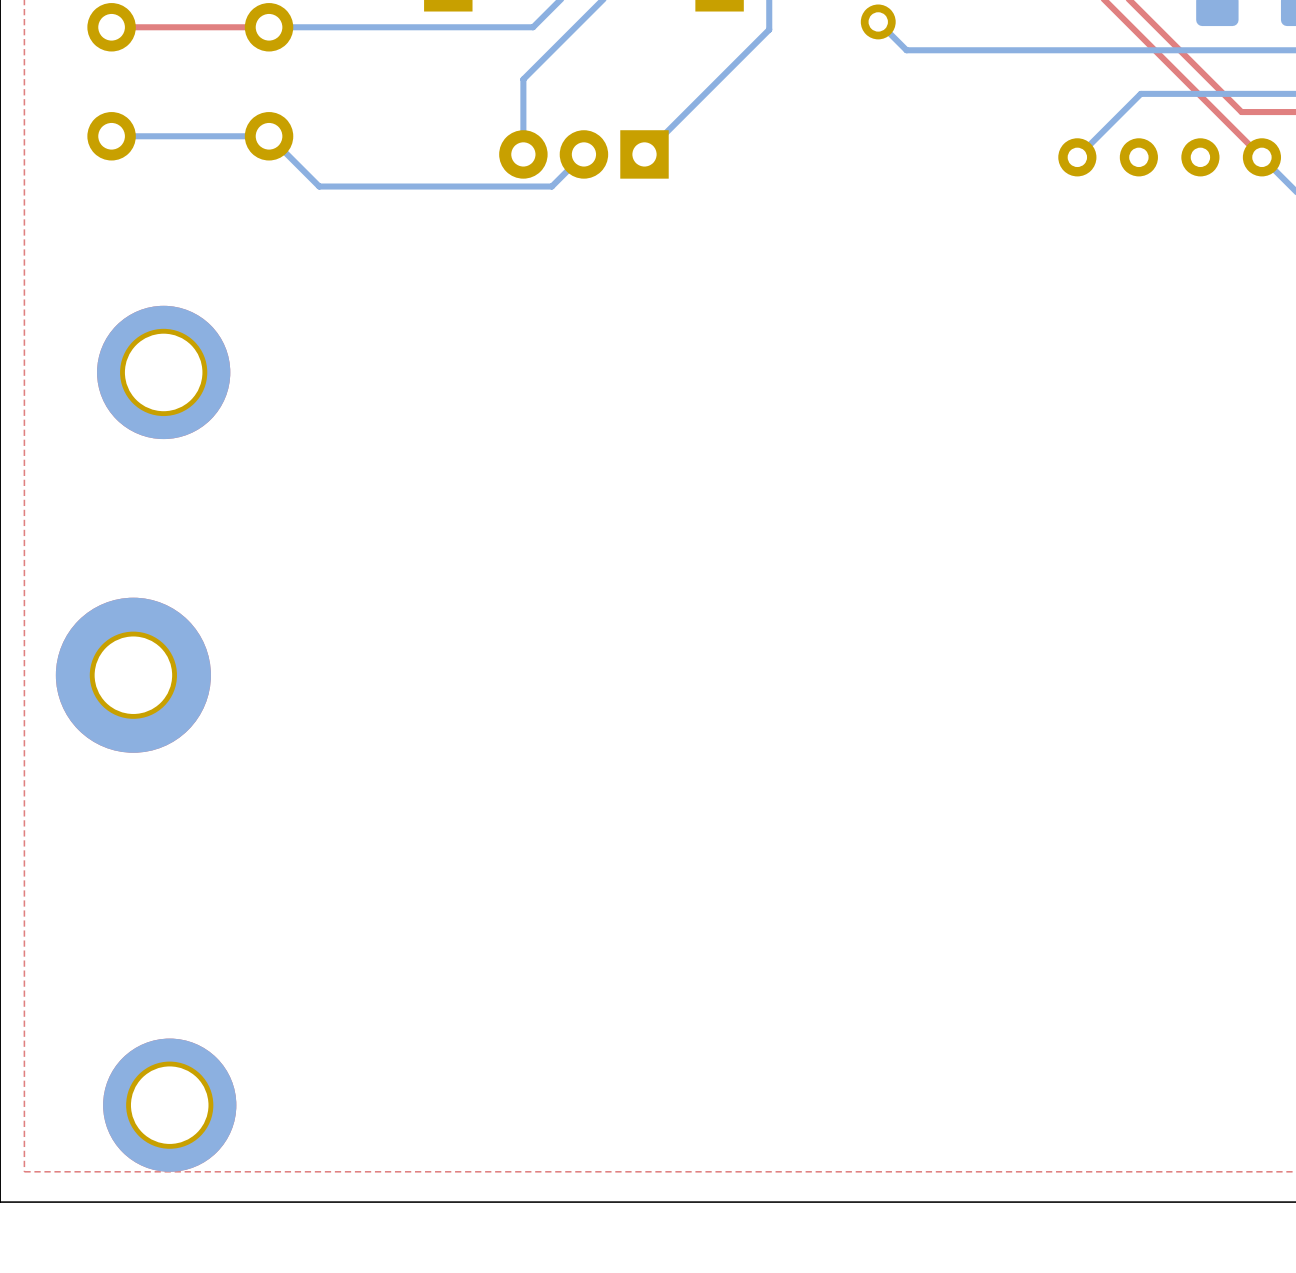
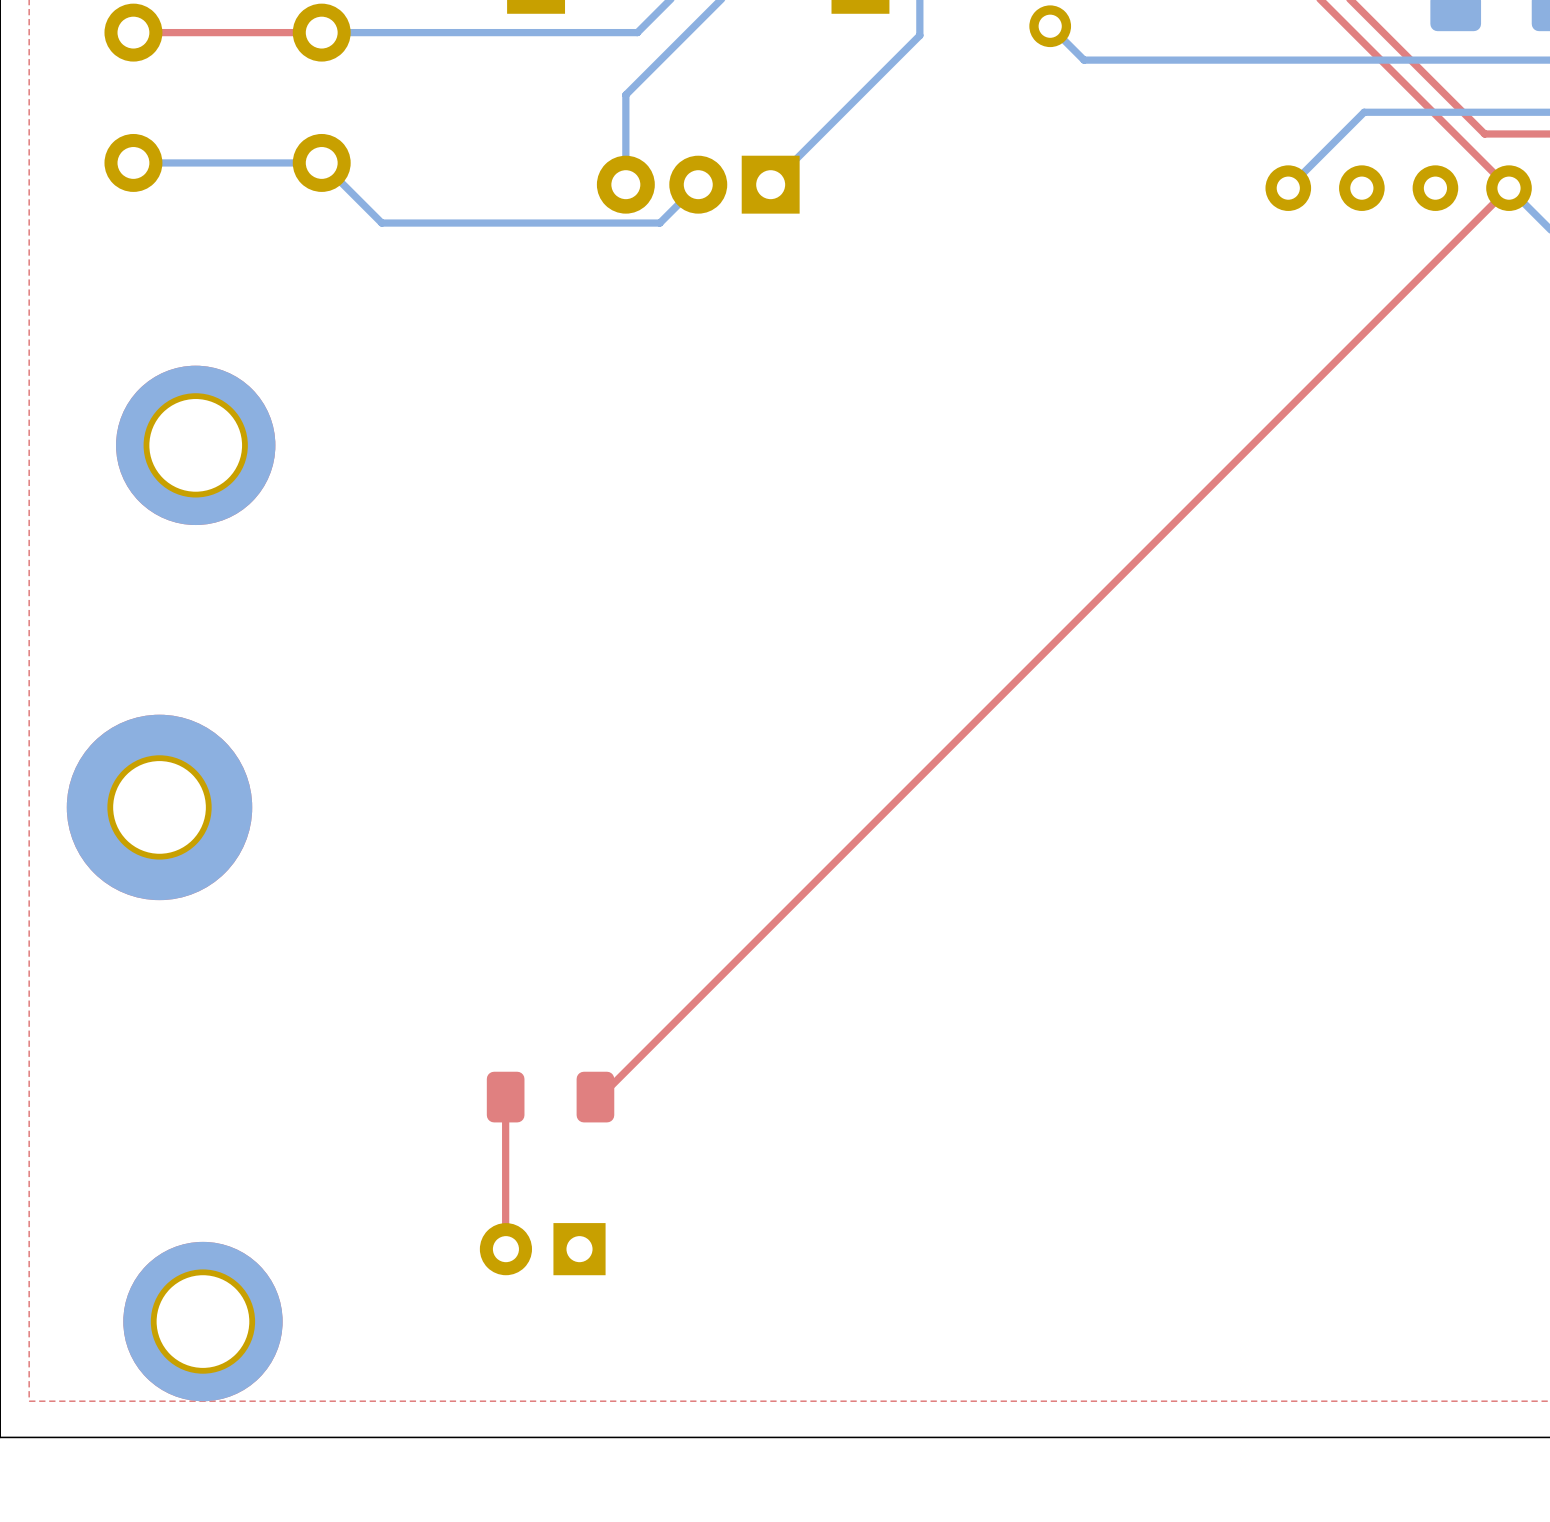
top track: none -> (1509, 188) (600, 1097) (595, 1097)
top track: none -> (505, 1097) (505, 1248)
part: none -> (550, 1097)
part: none -> (542, 1249)

